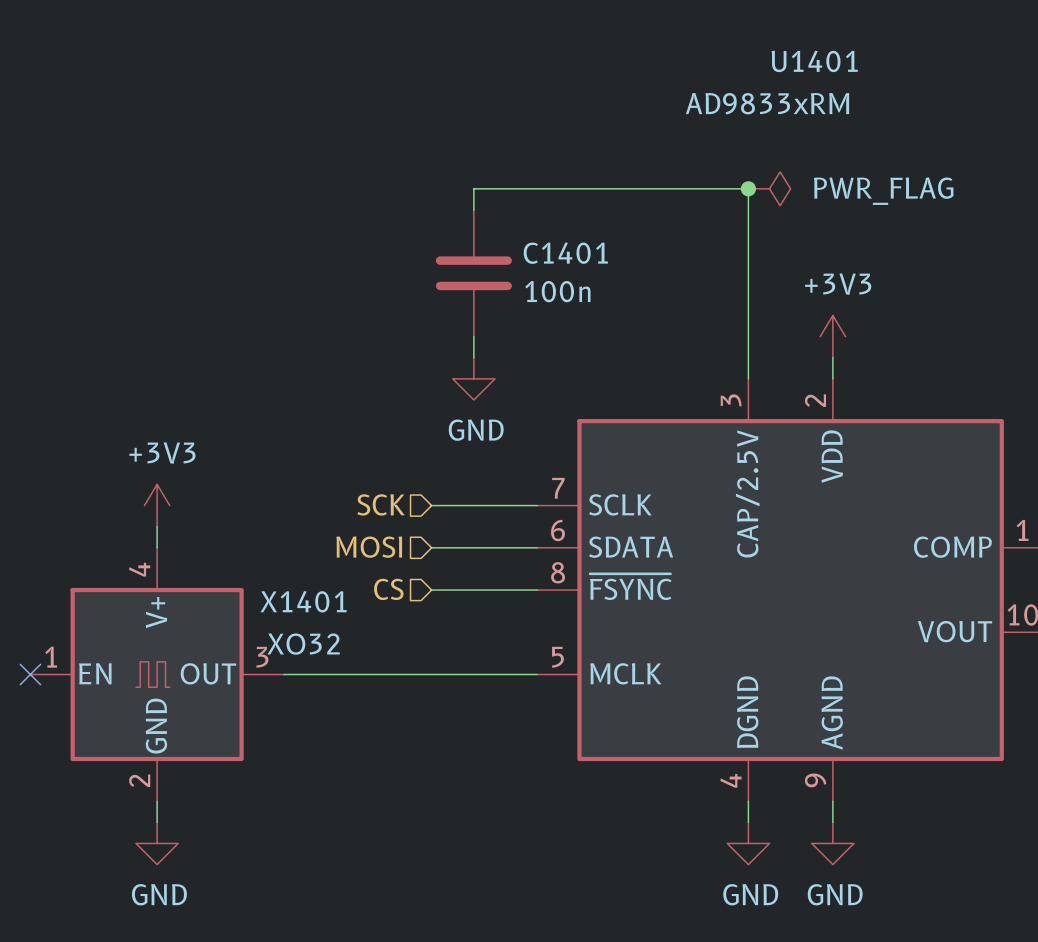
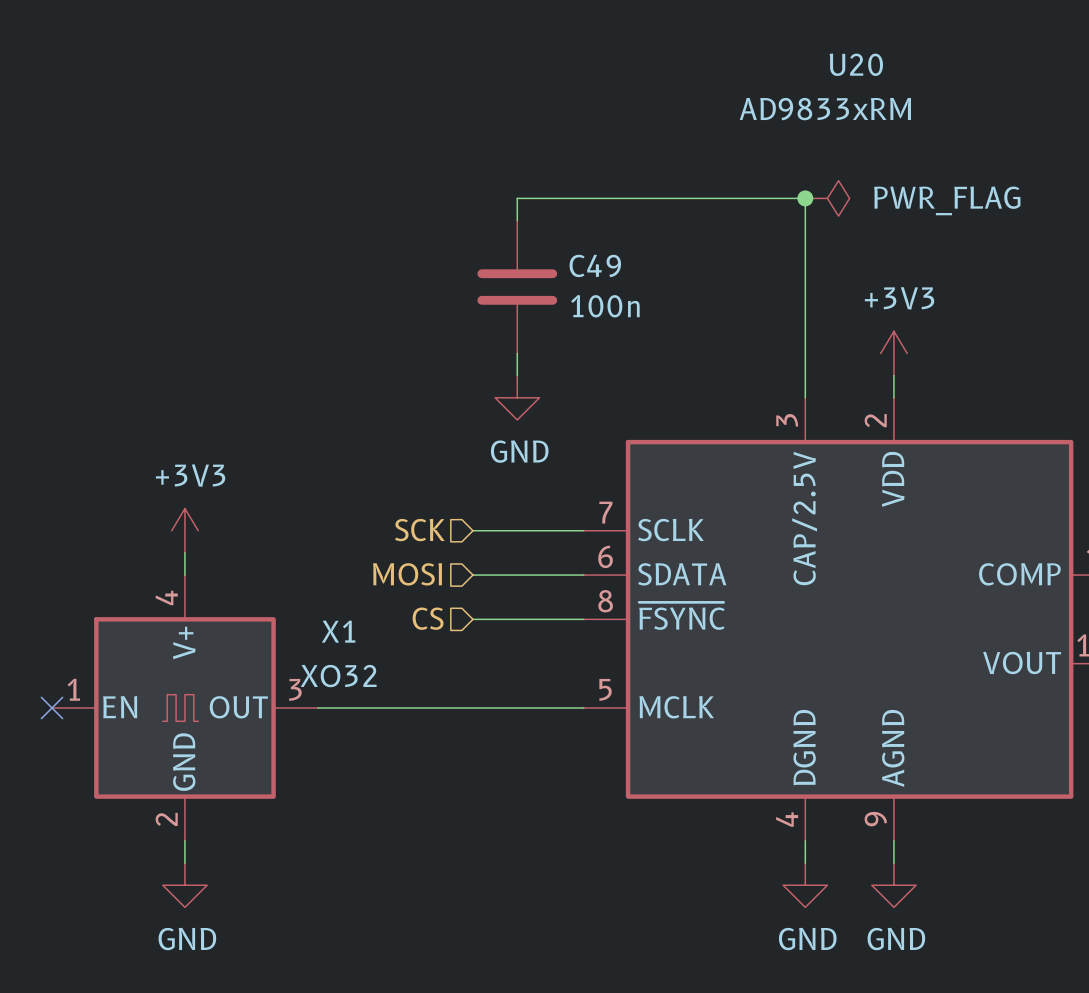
U1401 name: U1401 (814, 61) -> U20 (856, 64)
C1401 name: C1401 (565, 253) -> C49 (595, 265)
X1401 name: X1401 (303, 601) -> X1 (338, 631)

